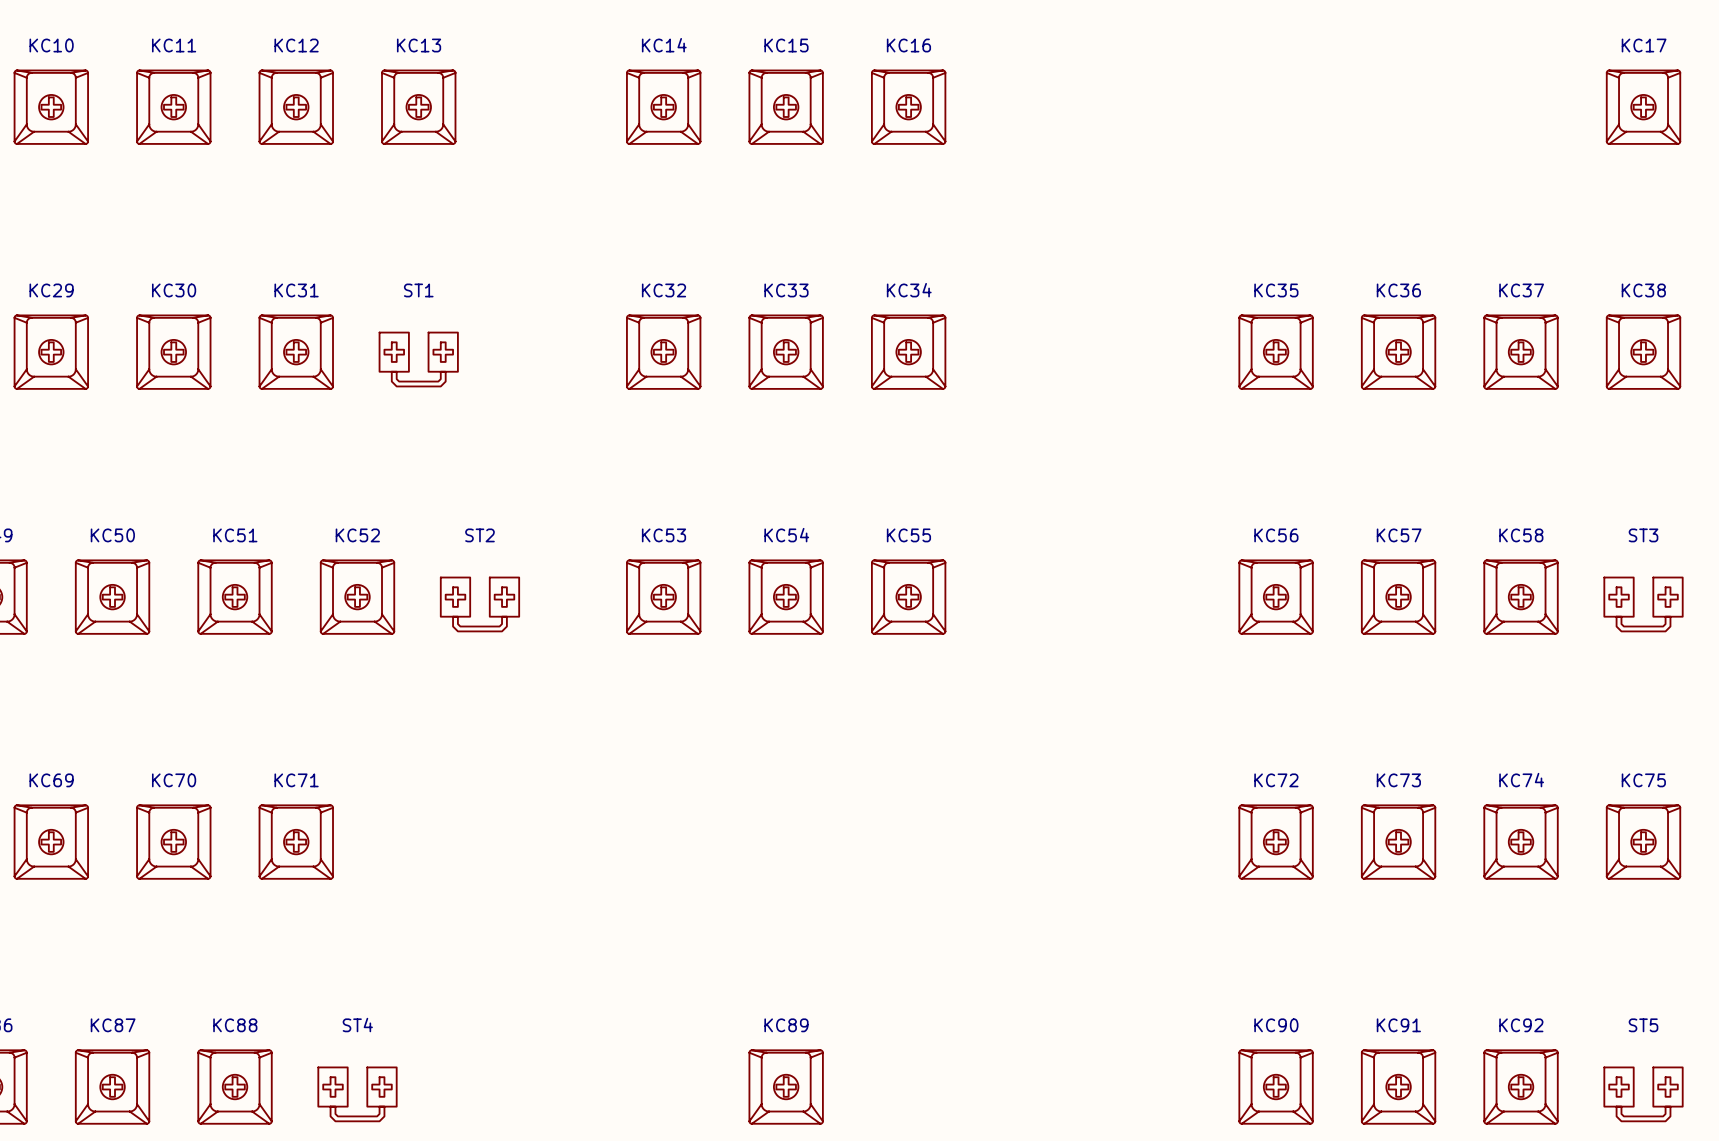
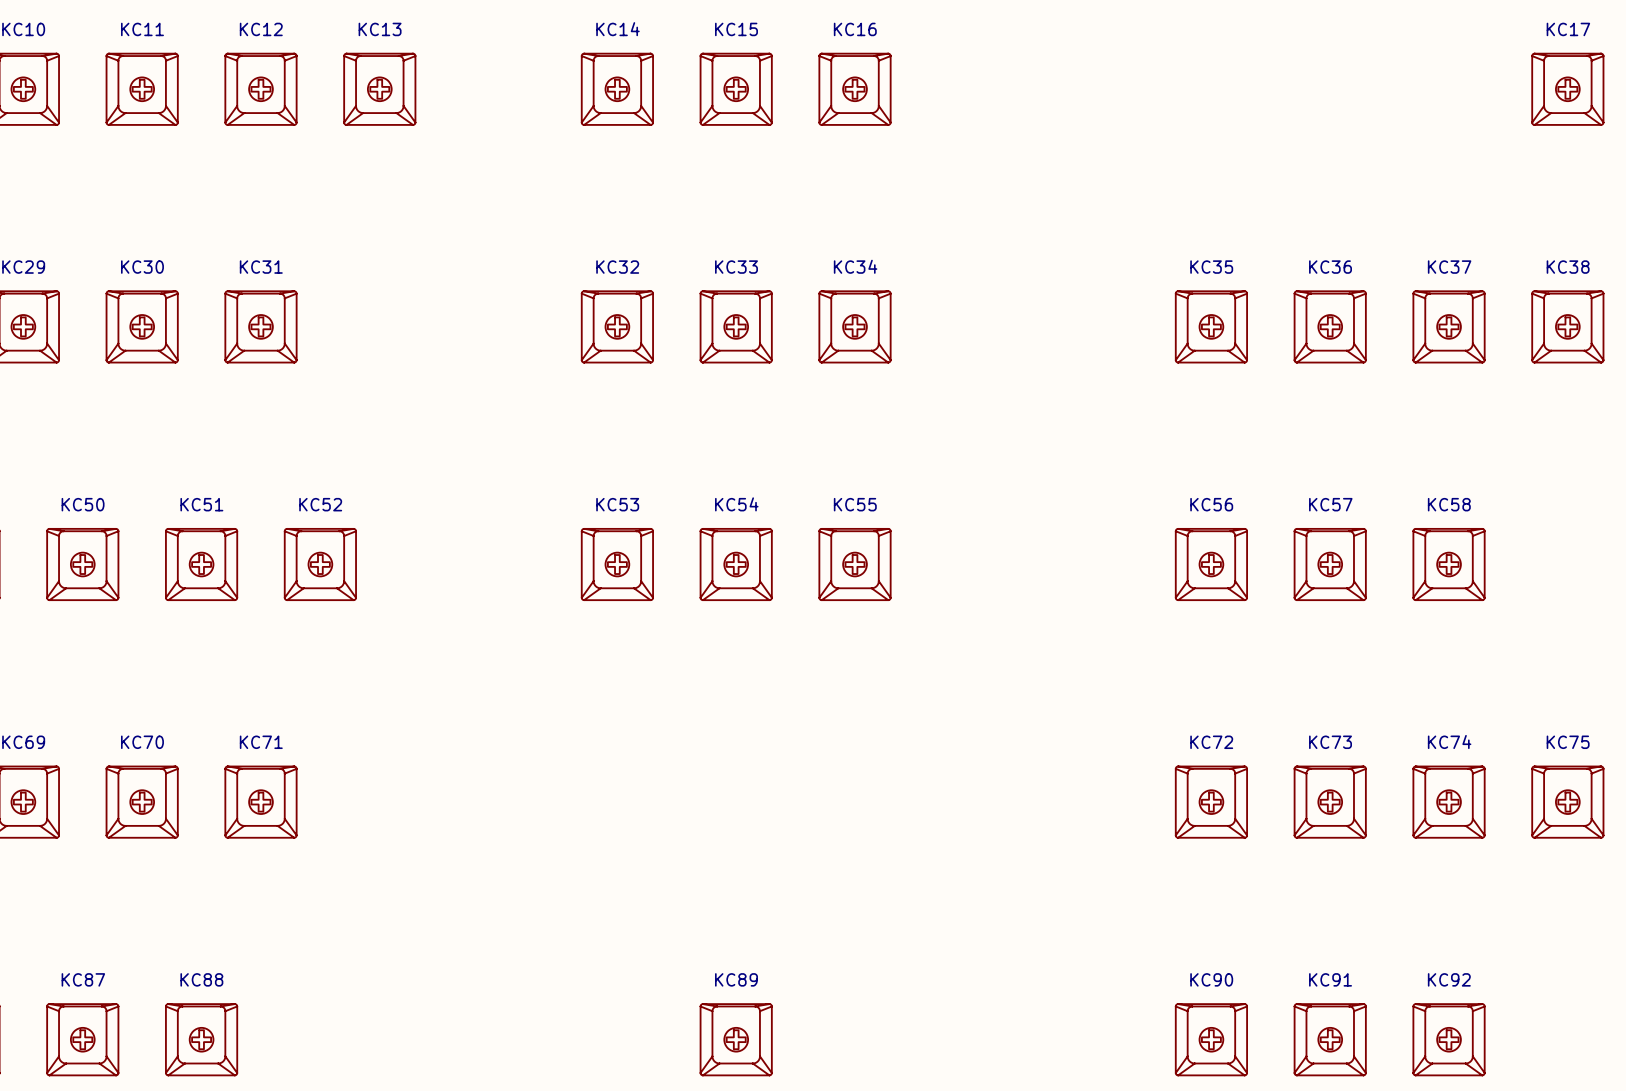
ST1: (418, 359) -> none
ST2: (479, 604) -> none
ST3: (1643, 604) -> none
ST4: (357, 1094) -> none
ST5: (1643, 1094) -> none

